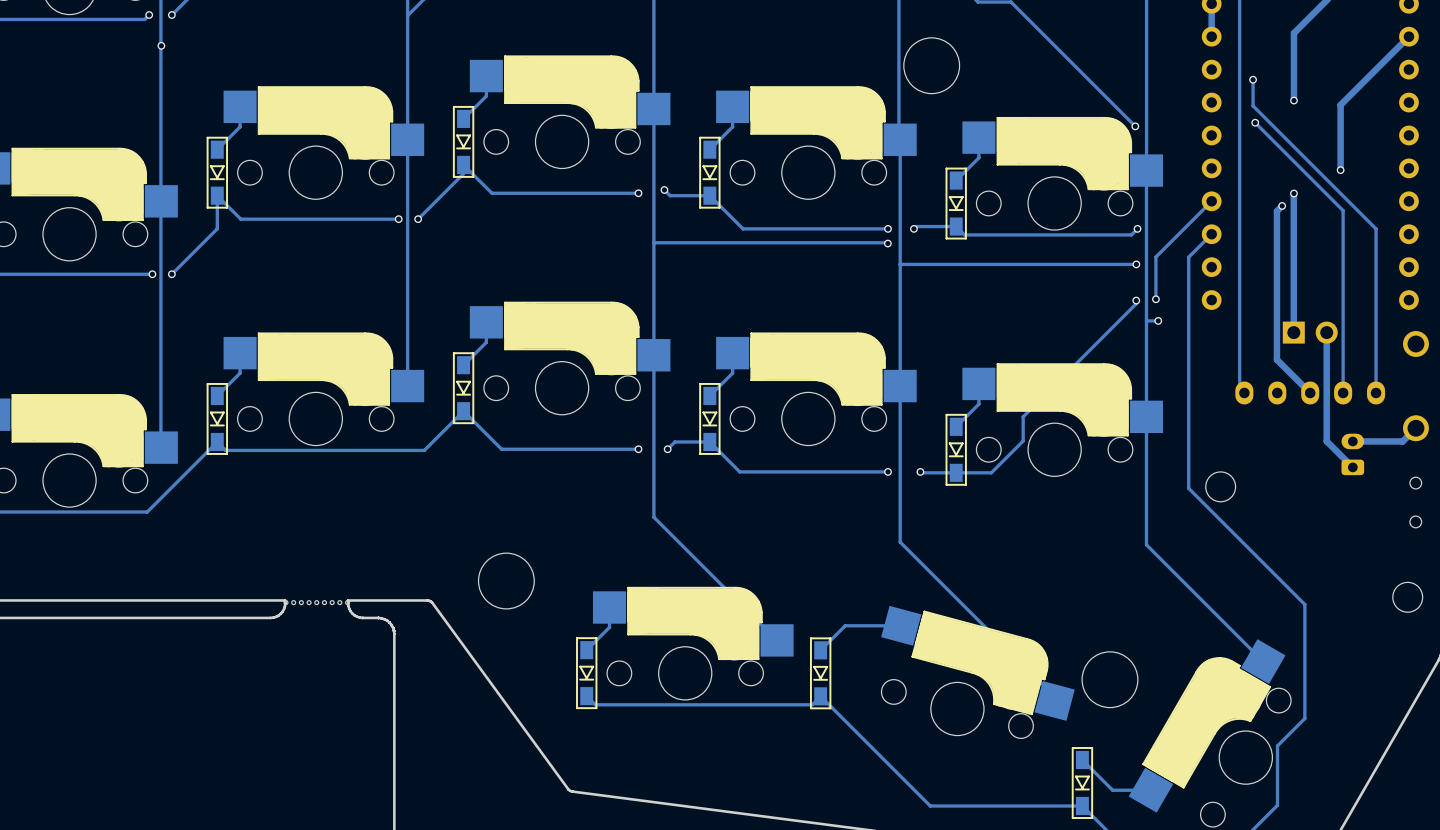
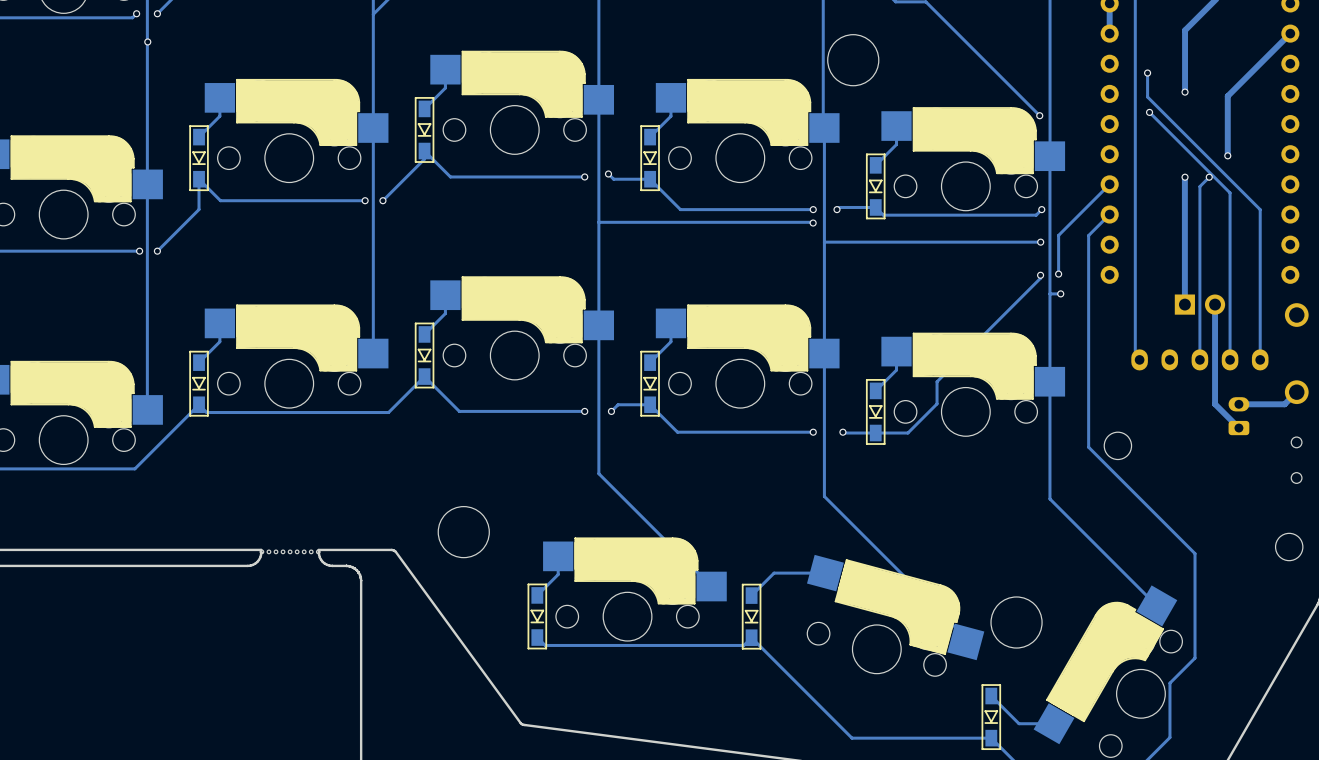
track: (1282, 205) (1276, 211) (1276, 359) (1310, 392) -> (1209, 177) (1199, 186) (1199, 359)
via position: (1282, 205) -> (1209, 177)

